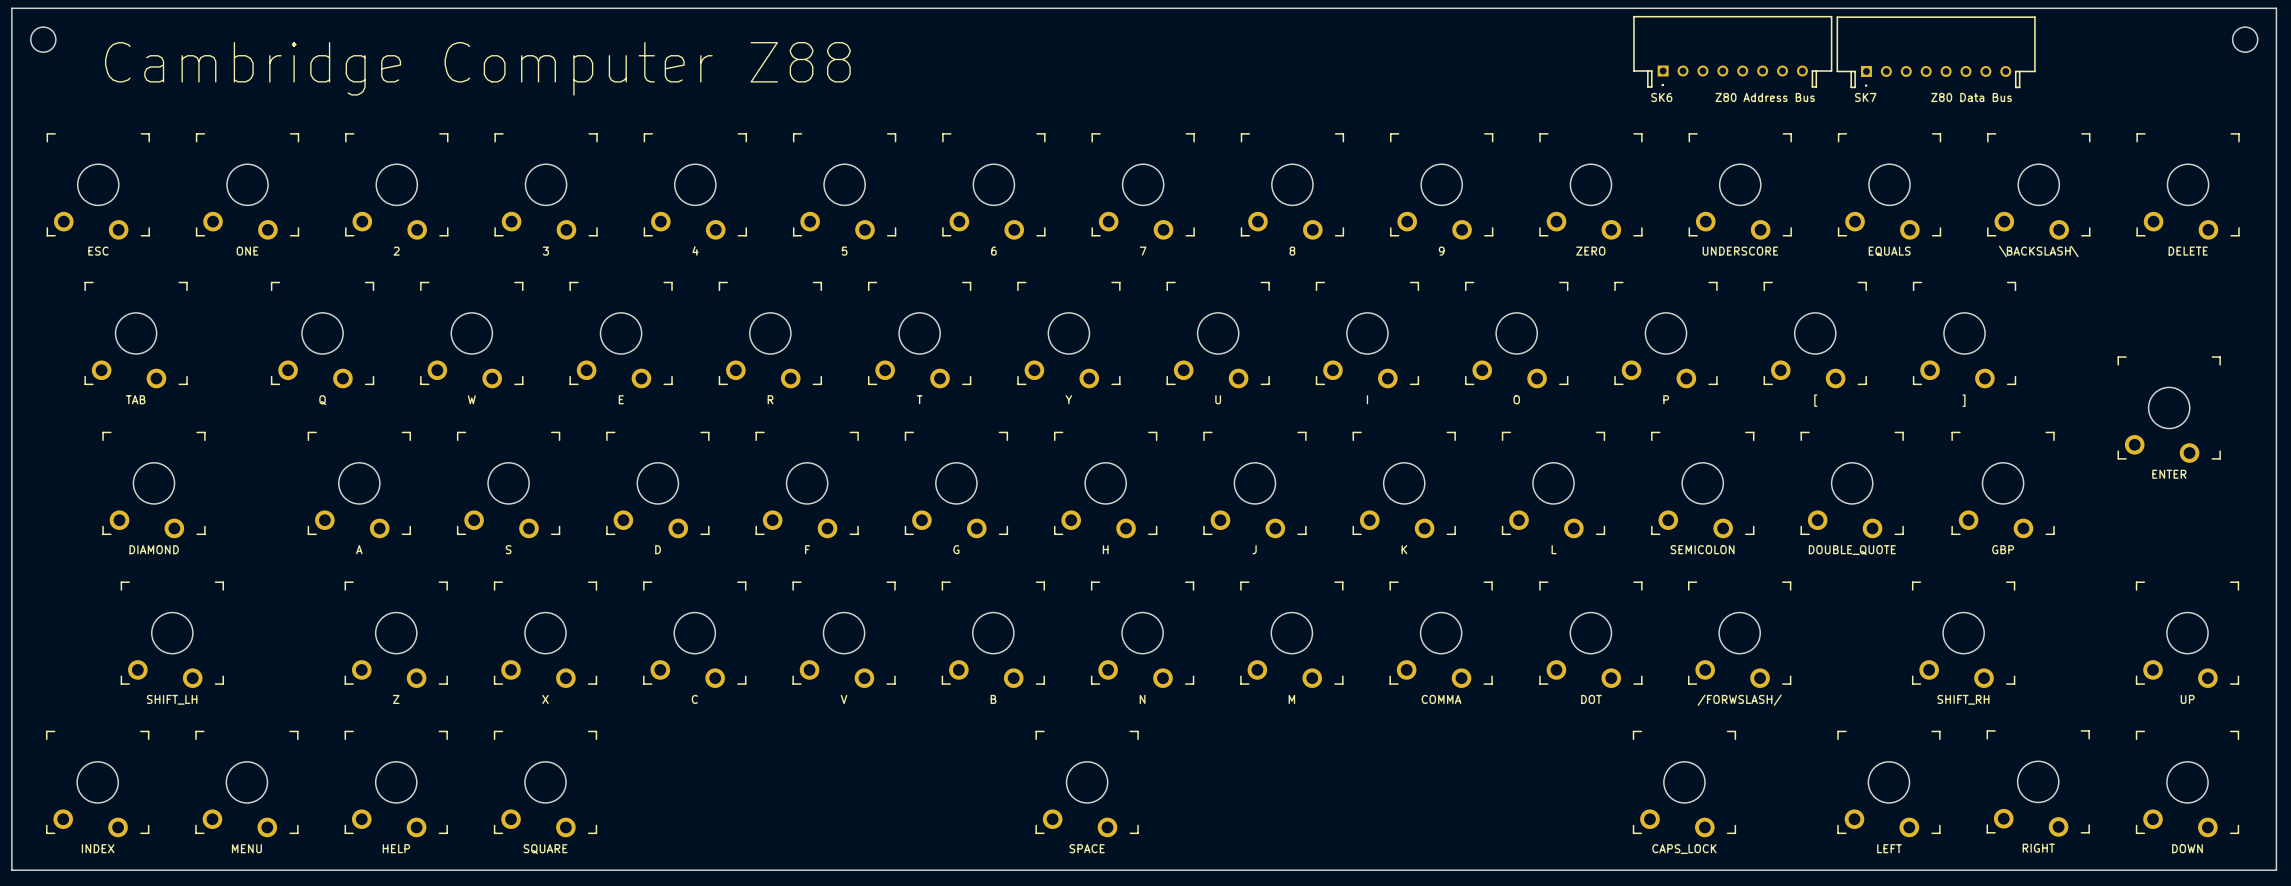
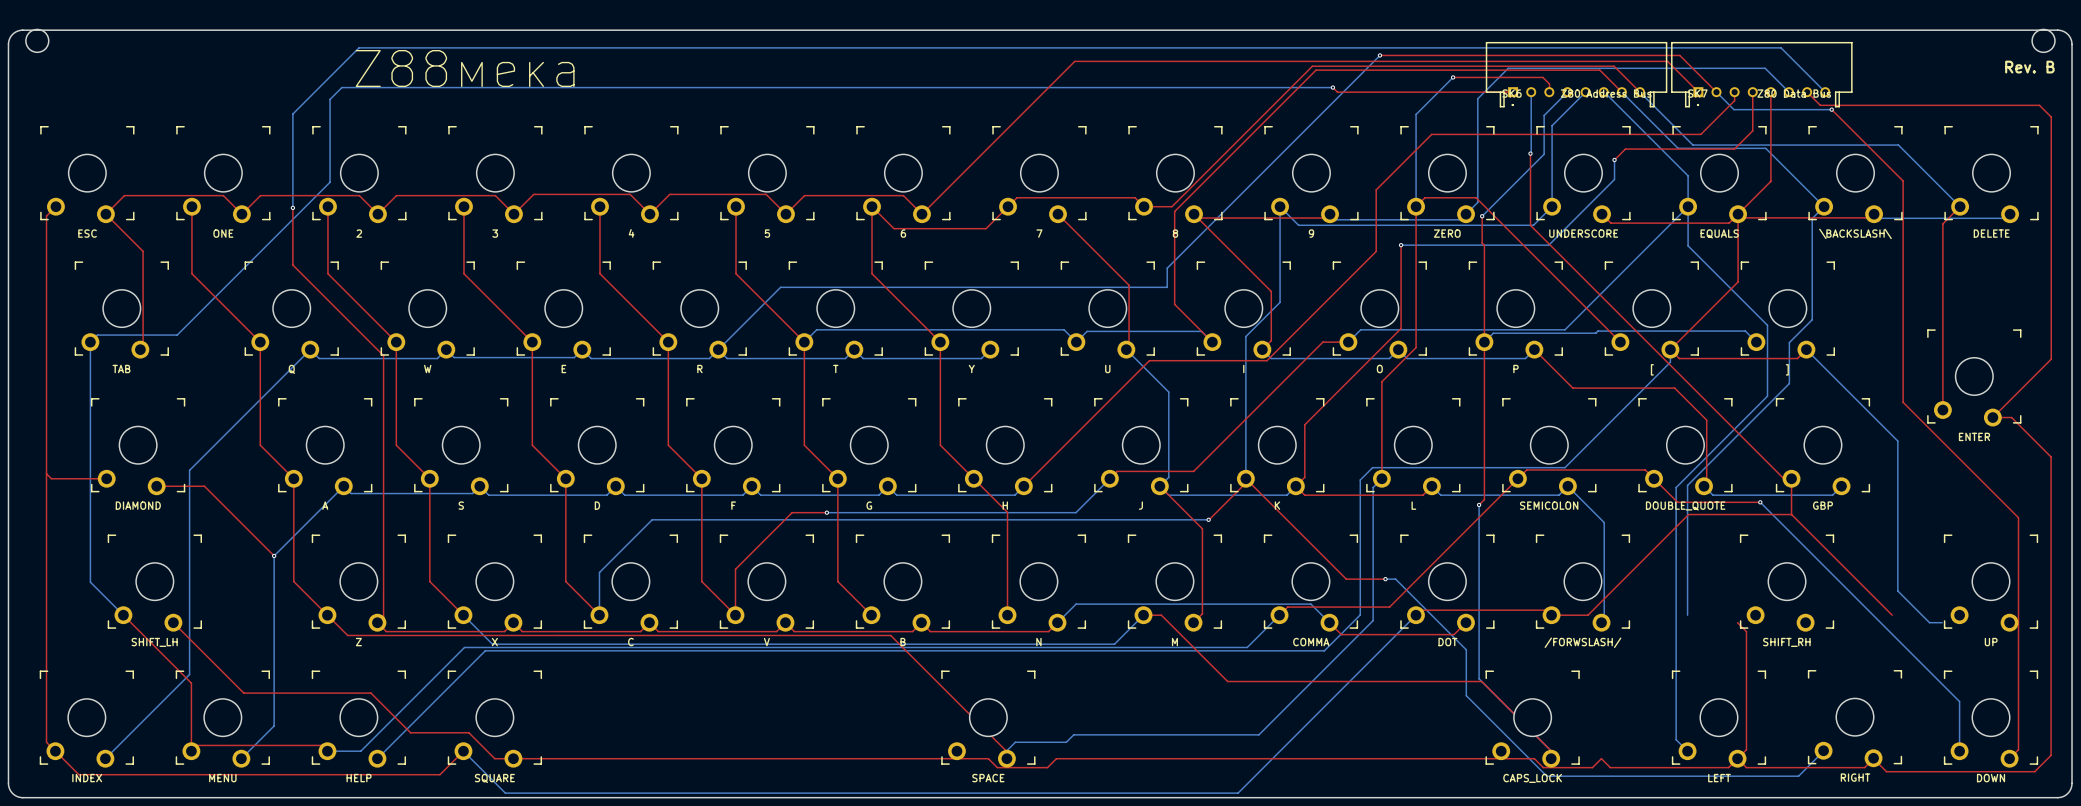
board edge: (11, 8) (2276, 8) (2276, 870) (11, 870) (11, 8) -> (22, 30) (12, 34) (8, 44) (8, 783) (11, 792) (18, 796) (2057, 797) (2064, 795) (2070, 788) (2072, 44) (2068, 35) (2062, 30) (22, 30)
part: (1732, 51) -> none
part: (1936, 52) -> none
top track: none -> (1379, 55) (1679, 55) (1716, 92)
bottom track: none -> (1379, 55) (1167, 268) (1167, 287) (780, 287) (709, 358) (591, 358) (582, 349) (574, 357) (454, 357) (446, 349) (437, 358) (319, 358) (310, 349) (189, 470) (189, 674) (105, 758)
via: none -> (1379, 55)
text: Cambridge Computer Z88 (477, 68) -> none
text: none -> Rev. B (2029, 67)
text: none -> Z88мека (465, 68)
part: none -> (1576, 74)
part: none -> (1761, 74)
top track: none -> (1453, 77) (1542, 77) (1549, 84) (1549, 92)
bottom track: none -> (1453, 77) (1416, 114) (1416, 206)
via: none -> (1453, 77)
top track: none -> (1332, 87) (1337, 92) (1513, 92)
bottom track: none -> (1332, 87) (341, 87) (330, 99) (330, 182) (177, 335) (97, 335) (90, 342) (90, 582) (123, 615)
via: none -> (1332, 87)
bottom track: none -> (1531, 92) (1531, 152)
bottom track: none -> (1567, 92) (1544, 115) (1544, 154) (1482, 216)
bottom track: none -> (1585, 92) (1552, 125) (1552, 206) (1533, 225) (1298, 225) (1280, 206) (1280, 302) (1245, 336) (1245, 478)
bottom track: none -> (1603, 91) (1688, 175) (1688, 245) (1767, 325) (1767, 396) (1676, 487) (1676, 739) (1687, 751)
top track: none -> (1621, 92) (1599, 70) (1316, 70) (1174, 211) (1174, 304) (1212, 342)
top track: none -> (1640, 92) (1614, 66) (1312, 66) (1171, 206) (1144, 206) (1135, 197) (1016, 197) (986, 228) (893, 228) (872, 206) (872, 273) (940, 342) (940, 445) (1007, 512) (1007, 615)
top track: none -> (1698, 92) (1667, 61) (1074, 61) (921, 214) (903, 195) (804, 195) (785, 214) (766, 194) (669, 194) (649, 214) (630, 194) (533, 194) (513, 214) (495, 195) (396, 195) (377, 214) (359, 195) (260, 195) (241, 214) (223, 195) (124, 195) (105, 214) (143, 251) (143, 346) (140, 349)
bottom track: none -> (1716, 92) (1733, 109) (1831, 109)
top track: none -> (1734, 92) (1734, 100) (1700, 134) (1431, 134) (1376, 189) (1376, 251) (1266, 360) (1149, 360) (1023, 486)
top track: none -> (1752, 92) (1752, 130) (1734, 149) (1625, 149) (1614, 159)
top track: none -> (1770, 92) (1770, 181) (1729, 223) (1610, 223) (1602, 214)
bottom track: none -> (1789, 92) (1765, 68) (1508, 68) (1477, 98) (1477, 202) (1460, 219) (1335, 219) (1330, 214)
bottom track: none -> (1825, 92) (1781, 47) (359, 47) (292, 113) (292, 207)
bottom track: none -> (1622, 92) (1678, 148) (1765, 148) (1824, 206) (1812, 218) (1812, 319) (1789, 342) (1789, 383) (1687, 485) (1687, 615)
bottom track: none -> (1640, 92) (1692, 145) (1898, 145) (1960, 206)
top track: none -> (1807, 92) (1820, 105) (2039, 105) (2051, 117) (2051, 359) (1992, 417) (2011, 417) (2051, 456) (2051, 755) (2034, 771) (1886, 771) (1873, 758) (1864, 767) (1746, 767) (1737, 758)
top track: none -> (1831, 109) (1903, 181) (1903, 402) (2018, 517) (2018, 749) (2009, 758)
via: none -> (1831, 109)
top track: none -> (1530, 153) (1530, 225) (1783, 478) (1791, 478) (1791, 514)
via: none -> (1530, 153)
bottom track: none -> (1614, 159) (1614, 179) (1548, 245) (1401, 245)
via: none -> (1614, 159)
top track: none -> (55, 206) (46, 216) (46, 742) (78, 774) (439, 774) (463, 751)
top track: none -> (191, 206) (191, 273) (260, 342) (260, 445) (293, 478) (293, 581) (347, 635) (890, 635) (1006, 751)
top track: none -> (327, 206) (327, 273) (396, 342) (396, 445) (429, 478) (429, 581) (463, 615)
top track: none -> (463, 206) (463, 273) (532, 342) (532, 445) (565, 478) (565, 581) (599, 615)
top track: none -> (599, 206) (599, 273) (668, 342) (668, 445) (701, 478) (701, 581) (735, 615) (735, 569) (792, 512) (826, 512)
top track: none -> (736, 206) (736, 273) (804, 342) (804, 445) (837, 478) (837, 581) (871, 615)
bottom track: none -> (1688, 206) (1564, 329) (1360, 329) (1348, 342)
top track: none -> (1960, 206) (1942, 223) (1942, 410)
top track: none -> (292, 207) (292, 265) (383, 355) (383, 616) (377, 622) (386, 631) (504, 631) (513, 622) (522, 631) (640, 631) (649, 622) (658, 631) (776, 631) (785, 622) (794, 631) (912, 631) (921, 622) (930, 631) (1048, 631) (1057, 622)
via: none -> (292, 207)
top track: none -> (1058, 214) (1129, 285) (1129, 346) (1126, 349)
top track: none -> (1194, 214) (1271, 291) (1271, 340) (1262, 349)
top track: none -> (1330, 214) (1326, 218) (1197, 218)
top track: none -> (1874, 214) (1870, 217) (1741, 217) (1738, 214) (1738, 281) (1670, 349) (1679, 358) (1797, 358) (1806, 349)
bottom track: none -> (1874, 214) (1878, 218) (2005, 218) (2010, 214)
top track: none -> (1482, 216) (1482, 243) (1484, 245) (1484, 499) (1479, 504)
via: none -> (1482, 216)
top track: none -> (1401, 245) (1401, 328) (1304, 424) (1304, 477) (1295, 486) (1304, 495) (1422, 495) (1431, 486)
via: none -> (1401, 245)
bottom track: none -> (804, 342) (816, 329) (1064, 329) (1076, 342) (1087, 331) (1201, 331) (1212, 342)
top track: none -> (1348, 342) (1322, 342) (1193, 471) (1117, 471) (1109, 478)
bottom track: none -> (1484, 342) (1493, 333) (1595, 333) (1597, 331) (1745, 331) (1756, 342)
top track: none -> (1620, 342) (1476, 197) (1424, 197) (1416, 206) (1416, 347) (1381, 381) (1381, 478)
bottom track: none -> (718, 349) (727, 358) (845, 358) (854, 349) (863, 358) (981, 358) (990, 349)
bottom track: none -> (1126, 349) (1168, 392) (1168, 477) (1159, 486) (1168, 495) (1286, 495) (1295, 486)
bottom track: none -> (1262, 349) (1271, 358) (1389, 358) (1398, 349) (1407, 358) (1525, 358) (1534, 349)
top track: none -> (1534, 349) (1572, 388) (1674, 388) (1706, 420) (1706, 483) (1704, 486)
bottom track: none -> (1670, 349) (1670, 362) (1564, 467) (1372, 467) (1360, 479) (1360, 614) (1324, 650) (485, 650) (377, 758)
bottom track: none -> (1806, 349) (1897, 441) (1897, 590) (1929, 622) (1942, 622)
top track: none -> (46, 473) (51, 478) (106, 478)
bottom track: none -> (1109, 478) (1075, 512) (826, 512)
bottom track: none -> (1381, 478) (1373, 487) (1373, 620) (1258, 734) (1073, 734) (1066, 742) (1015, 742) (1006, 751)
top track: none -> (1162, 483) (1159, 486) (1202, 528) (1202, 613) (1193, 622)
top track: none -> (156, 486) (204, 486) (274, 555)
bottom track: none -> (1023, 486) (1014, 495) (896, 495) (887, 486) (878, 495) (760, 495) (751, 486) (742, 495) (624, 495) (615, 486) (606, 495) (488, 495) (479, 486) (472, 493) (351, 493) (343, 486) (274, 555) (274, 725) (241, 758)
bottom track: none -> (1431, 486) (1440, 495) (1558, 495) (1567, 486) (1604, 522) (1604, 620) (1601, 622)
bottom track: none -> (1704, 486) (1712, 495) (1832, 495) (1841, 486)
top track: none -> (1760, 502) (1677, 502) (1645, 469) (1526, 469) (1389, 607) (1287, 607) (1279, 615)
bottom track: none -> (1760, 502) (1959, 701) (1959, 751)
via: none -> (1760, 502)
bottom track: none -> (1479, 504) (1479, 678) (1551, 751)
via: none -> (1479, 504)
via: none -> (826, 512)
top track: none -> (1791, 514) (1688, 514) (1587, 615) (1551, 615) (1546, 610) (1421, 610) (1416, 615)
top track: none -> (1791, 514) (1892, 615)
top track: none -> (1208, 519) (1245, 482) (1245, 478) (1346, 579) (1385, 579)
bottom track: none -> (1208, 519) (652, 519) (599, 572) (599, 615)
via: none -> (1208, 519)
via: none -> (274, 555)
bottom track: none -> (1385, 579) (1395, 579) (1466, 649) (1466, 695) (1546, 776) (1798, 776) (1823, 751) (1818, 746)
via: none -> (1385, 579)
top track: none -> (123, 615) (191, 683) (191, 751) (197, 745) (321, 745) (327, 751)
bottom track: none -> (463, 615) (492, 644) (1114, 644) (1143, 615)
top track: none -> (1143, 615) (1161, 615) (1227, 681) (1481, 681) (1551, 751)
bottom track: none -> (1279, 615) (1247, 647) (464, 647) (360, 751) (327, 751)
bottom track: none -> (1416, 615) (1238, 793) (505, 793) (463, 751)
top track: none -> (173, 622) (243, 693) (370, 693) (410, 732) (468, 732) (494, 758) (988, 758) (997, 767) (1047, 767) (1056, 758) (1534, 758) (1543, 767) (1592, 767) (1601, 758) (1610, 767) (1728, 767) (1746, 749) (1746, 631) (1737, 622)
bottom track: none -> (1057, 622) (1076, 604) (1310, 604) (1329, 622)
top track: none -> (1329, 622) (1341, 634) (1454, 634) (1465, 622)

